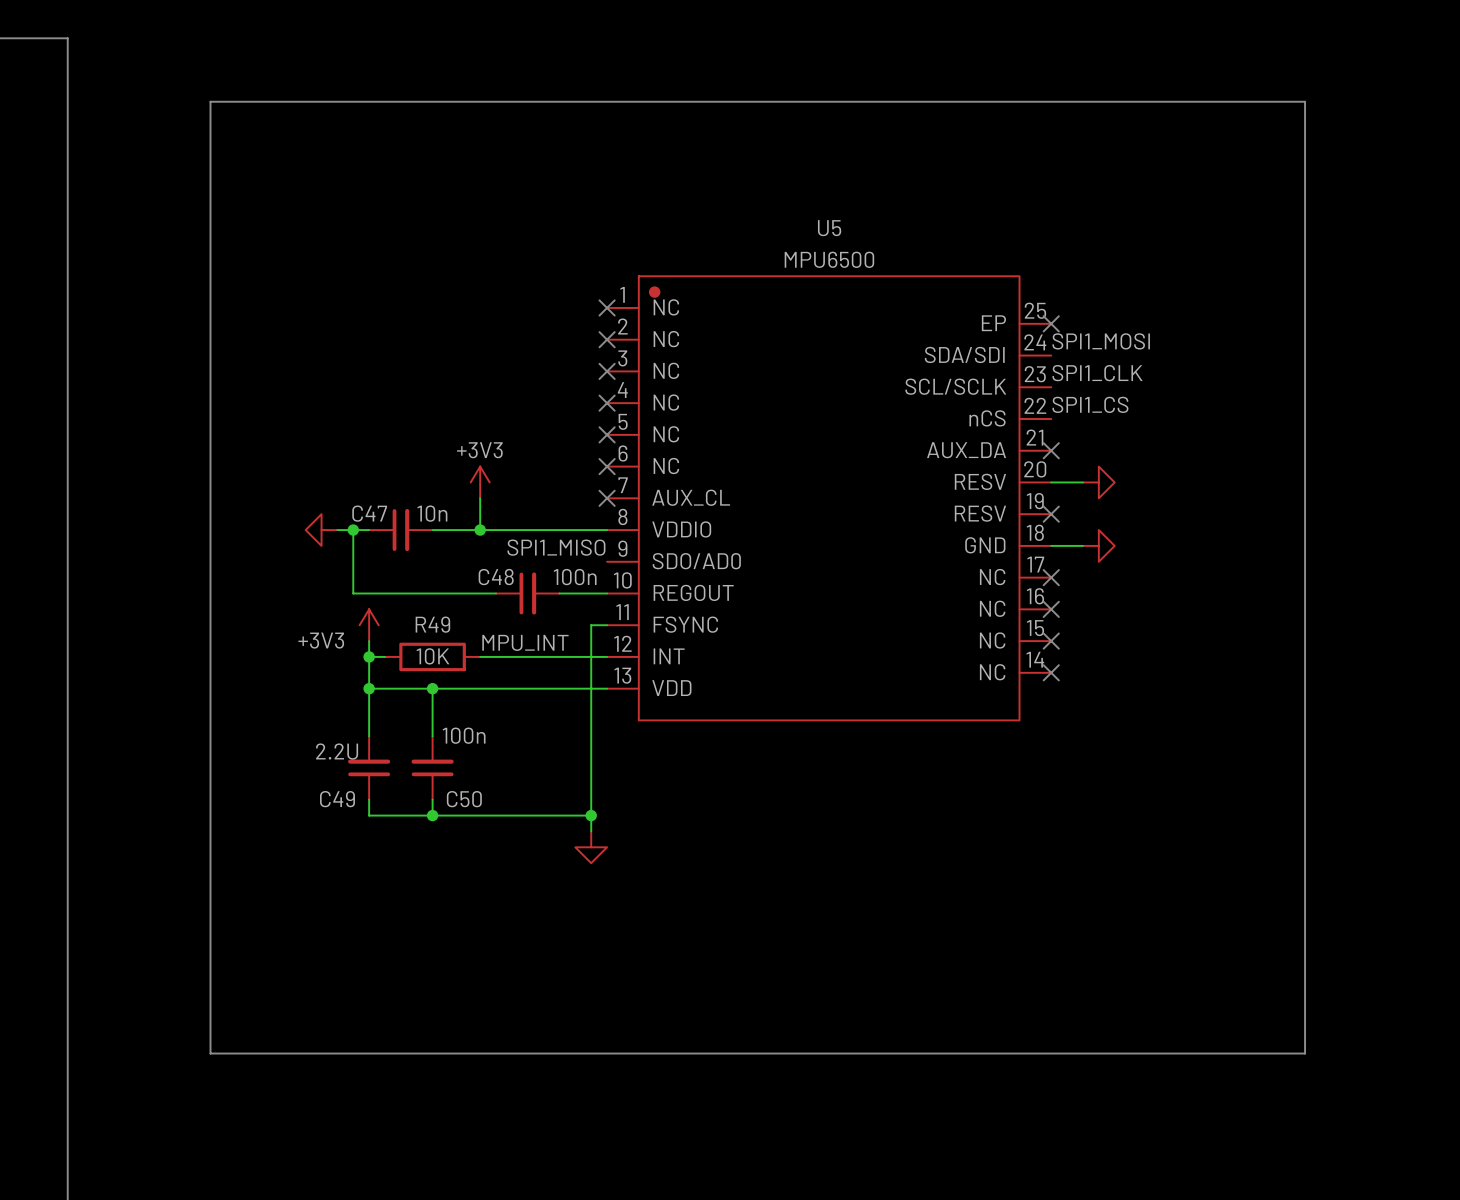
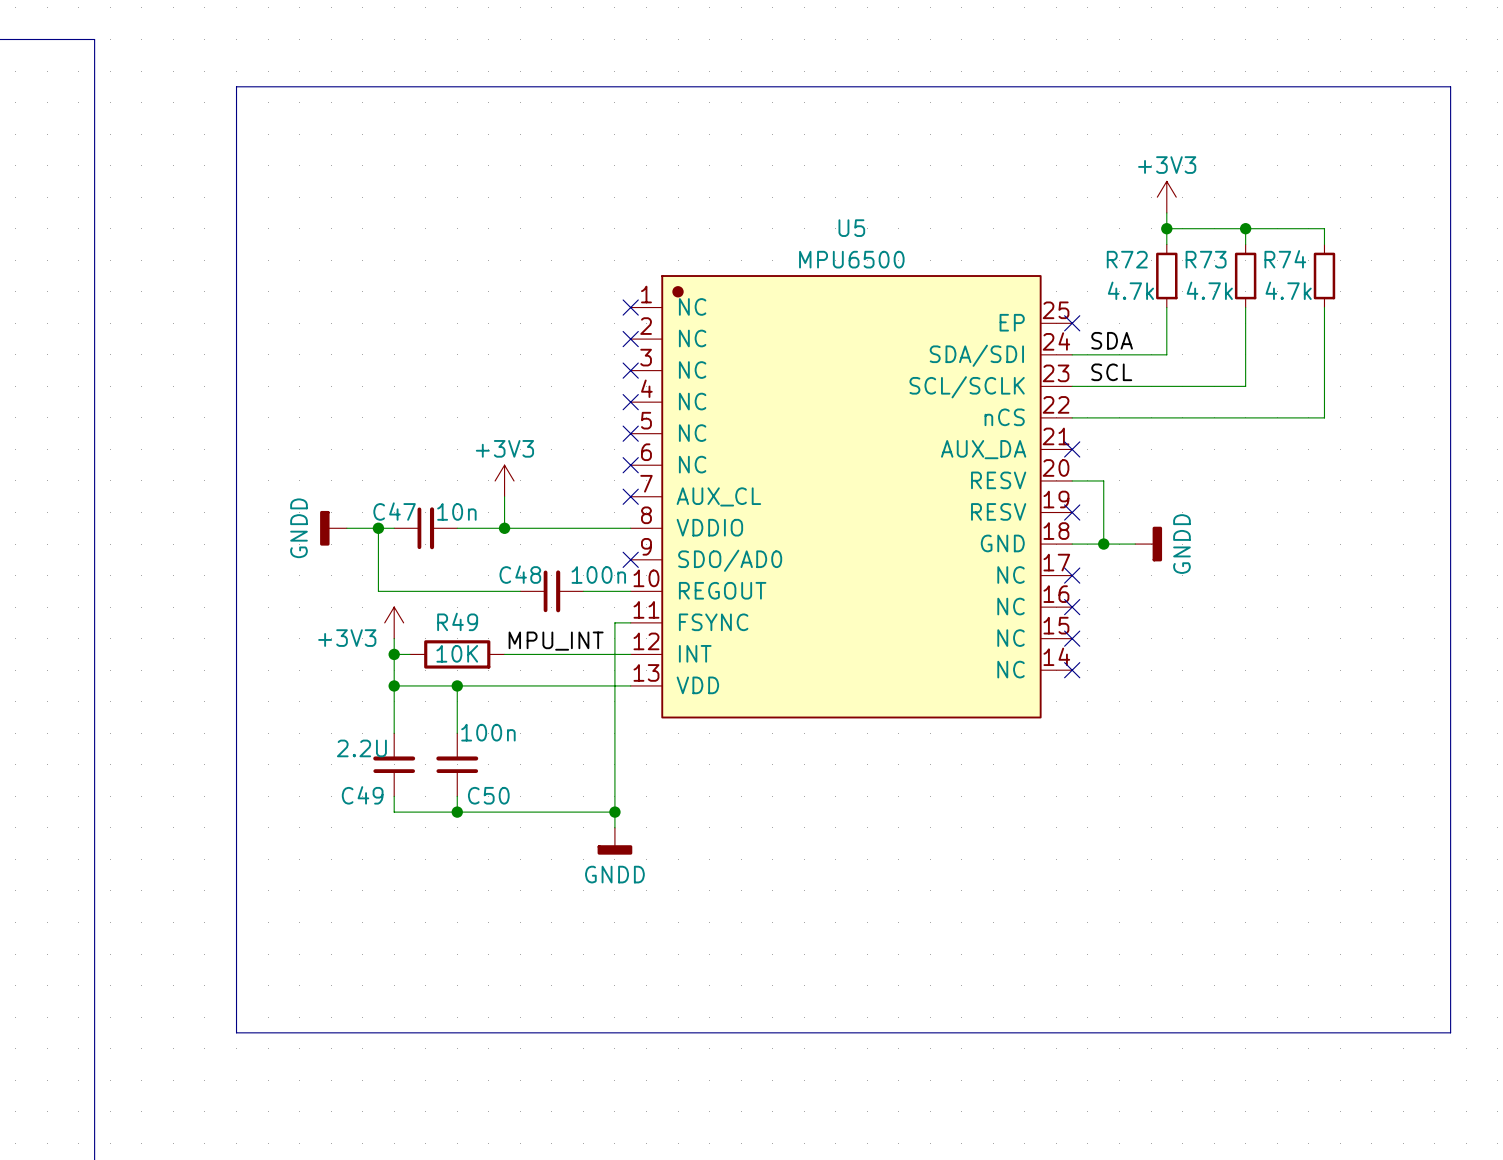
line: (210, 101) (1305, 101) (1305, 1053) (210, 1053) (210, 1037) -> (236, 102) (236, 86) (1450, 86) (1450, 1032) (236, 1032)
power symbol: none -> +3V3 (1166, 197)
wire: none -> (1166, 212) (1166, 244)
wire: none -> (1166, 228) (1324, 228) (1324, 244)
junction: none -> (1166, 228)
wire: none -> (1245, 228) (1245, 244)
junction: none -> (1245, 228)
R72: none -> 4.7k (1166, 276)
R73: none -> 4.7k (1245, 276)
R74: none -> 4.7k (1324, 276)
wire: none -> (1166, 307) (1166, 354) (1072, 354)
wire: none -> (1245, 307) (1245, 386) (1072, 386)
wire: none -> (1324, 307) (1324, 417) (1072, 417)
label: none -> SDA (1112, 340)
label: SPI1_MOSI (1101, 341) -> none
label: none -> SCL (1111, 372)
label: SPI1_CLK (1097, 373) -> none
label: SPI1_CS (1090, 404) -> none
wire: none -> (1103, 480) (1103, 544) (1135, 544)
power symbol: (1098, 482) -> none
power symbol: none -> GNDD (333, 528)
power symbol: (321, 530) -> none
junction: none -> (1103, 544)
power symbol: (1098, 545) -> none
power symbol: none -> GNDD (1148, 544)
label: SPI1_MISO (556, 547) -> none
no-connect mark: none -> (630, 559)
power symbol shape: [575, 831, 608, 864] -> [597, 827, 633, 855]
power symbol text: none -> GNDD (614, 874)

